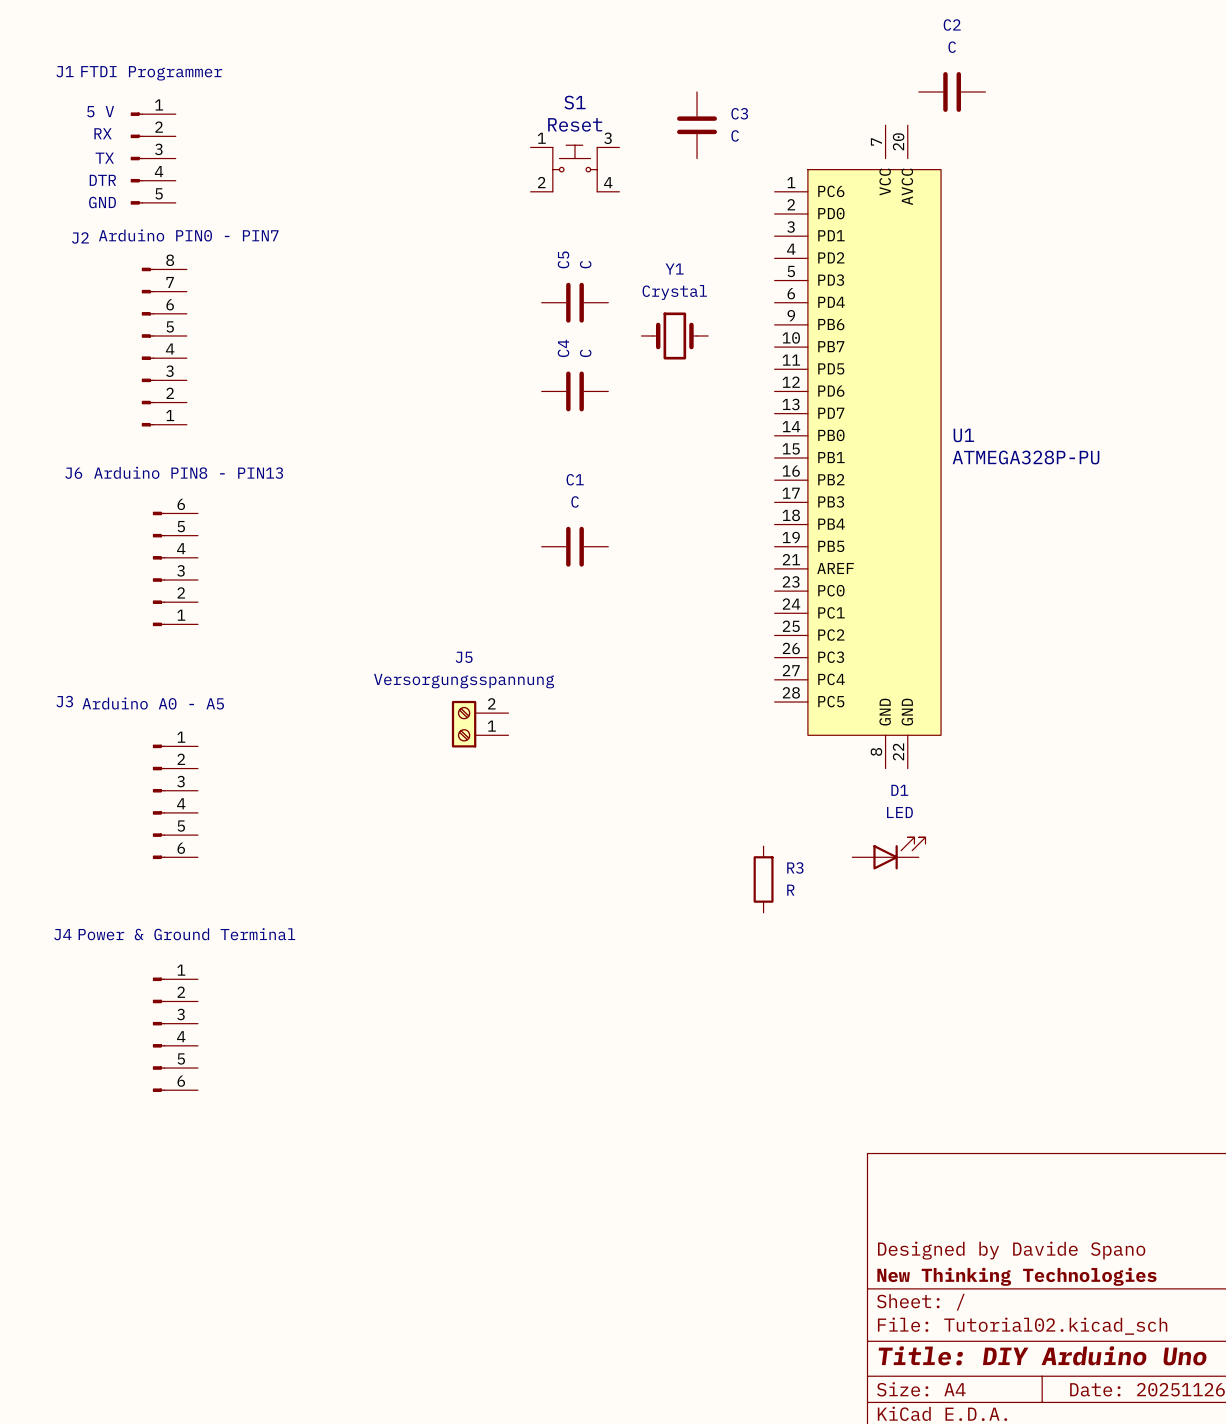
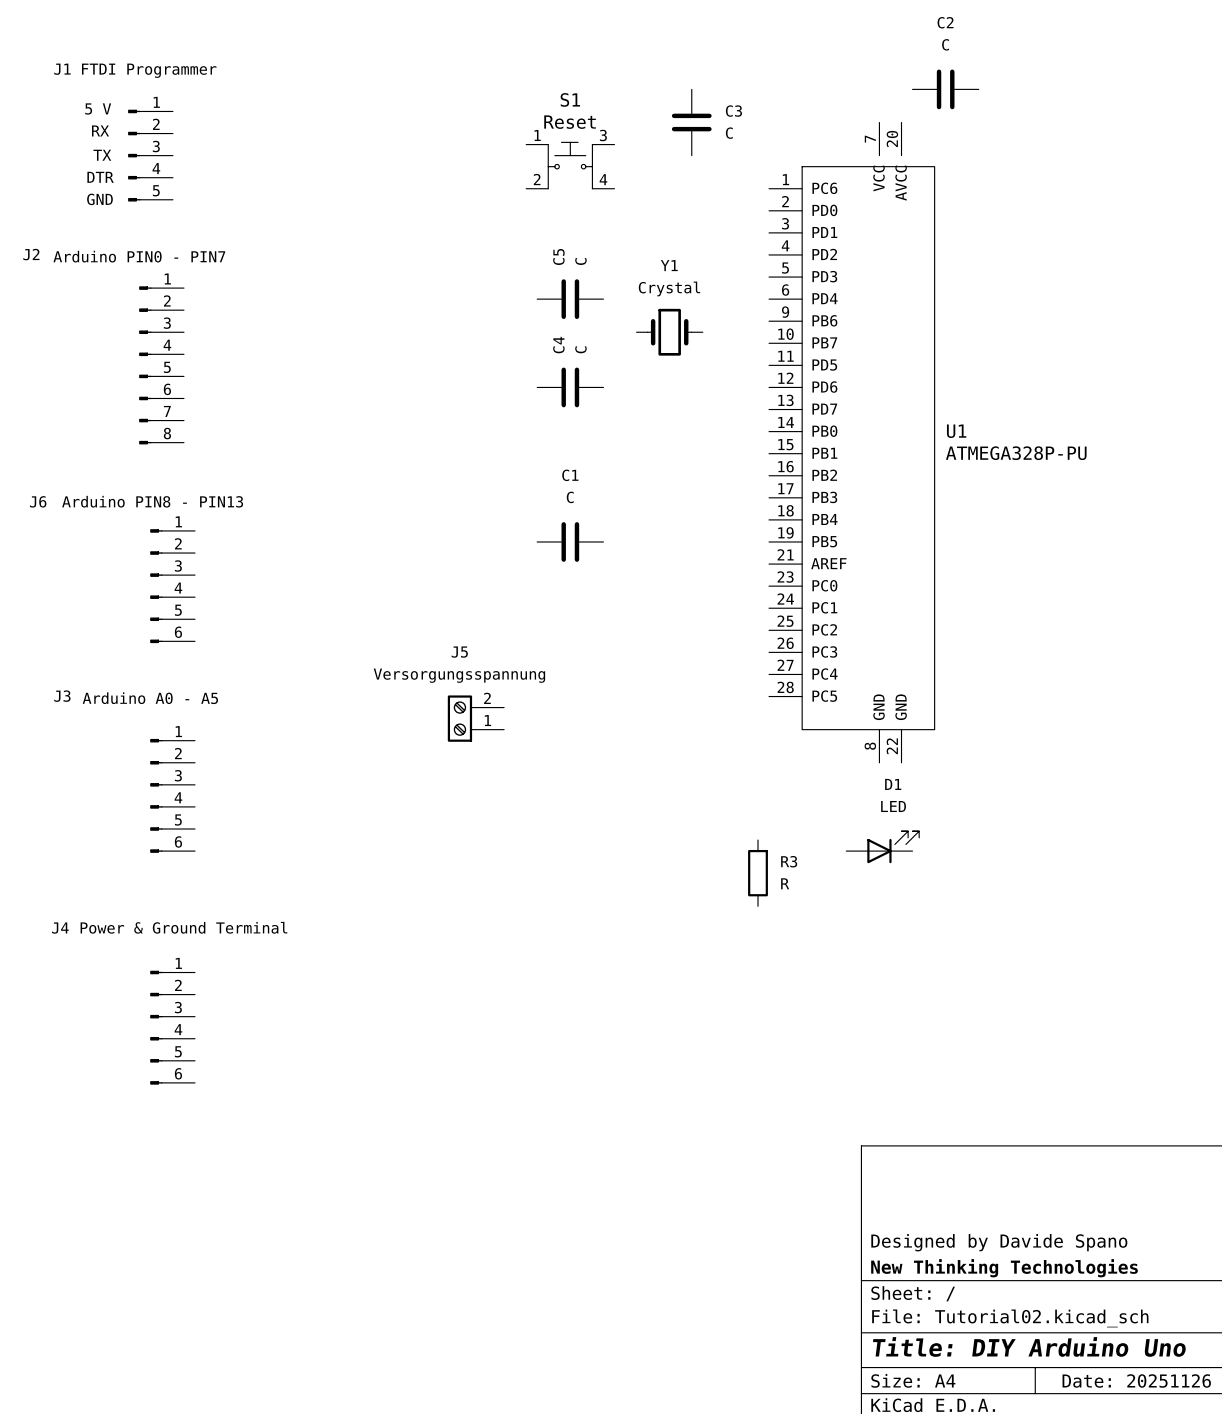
J2 value position: Arduino PIN0 - PIN7 (188, 235) -> Arduino PIN0 - PIN7 (139, 256)
J2 name position: J2 (80, 237) -> J2 (31, 254)
J2 flip: as is (147, 347) -> up-down (145, 365)
J6 value position: Arduino PIN8 - PIN13 (188, 472) -> Arduino PIN8 - PIN13 (152, 501)
J6 name position: J6 (73, 473) -> J6 (38, 501)
J6 flip: as is (159, 568) -> up-down (156, 586)

